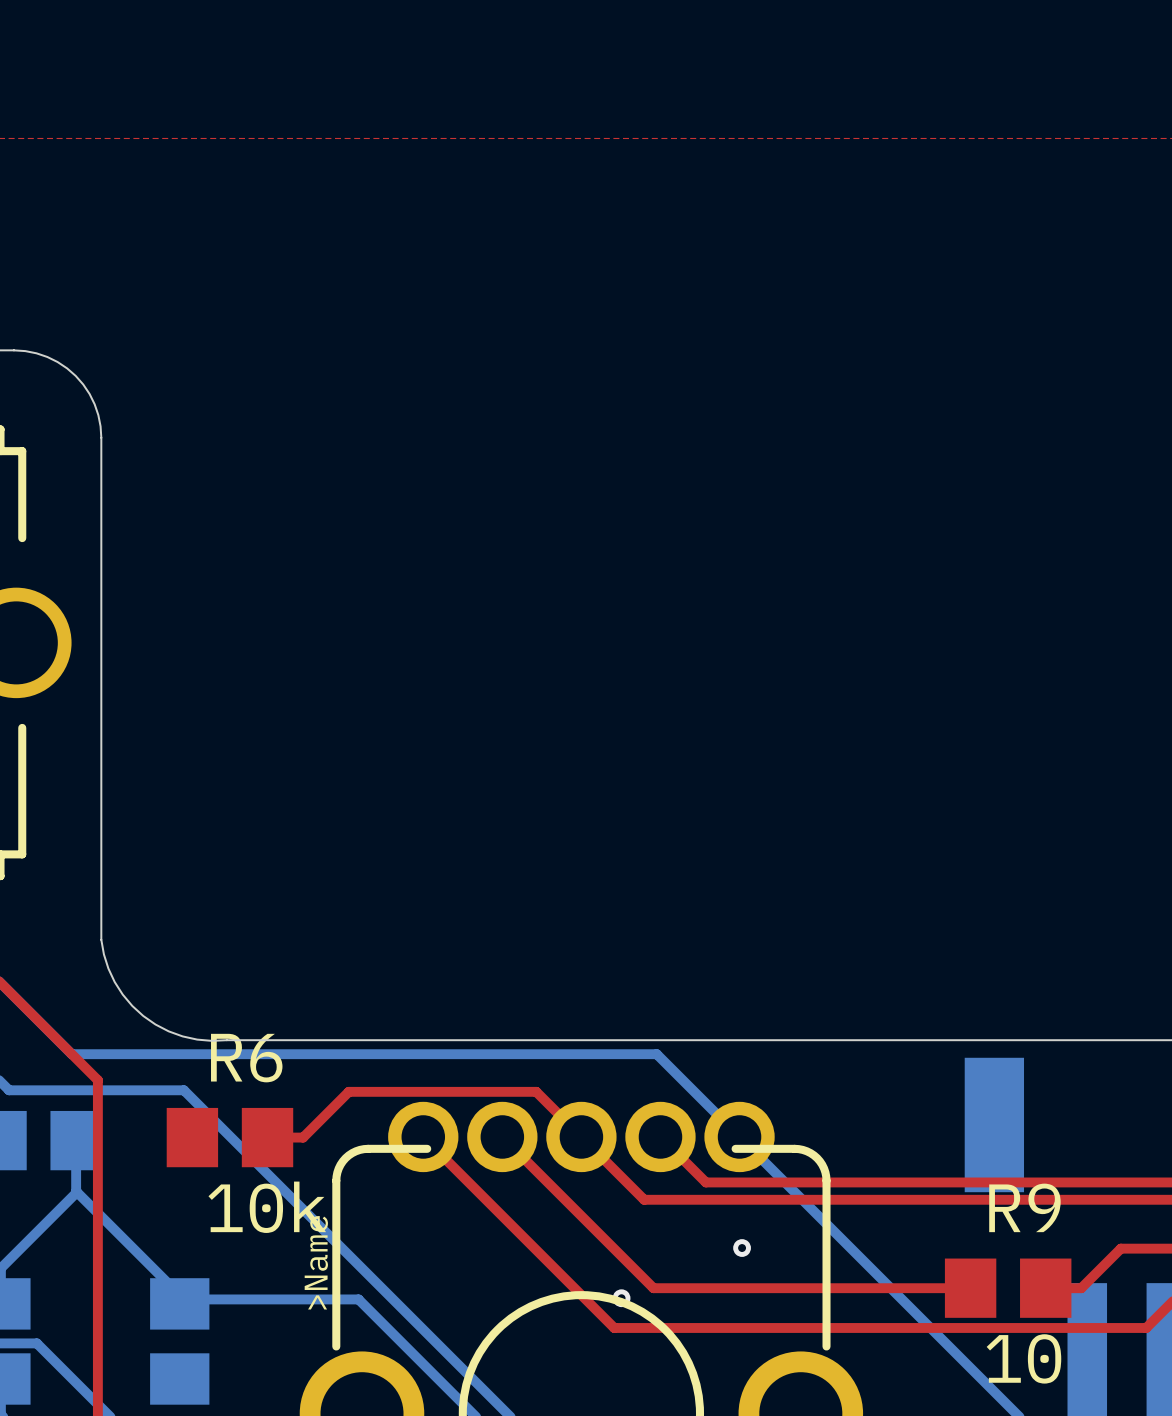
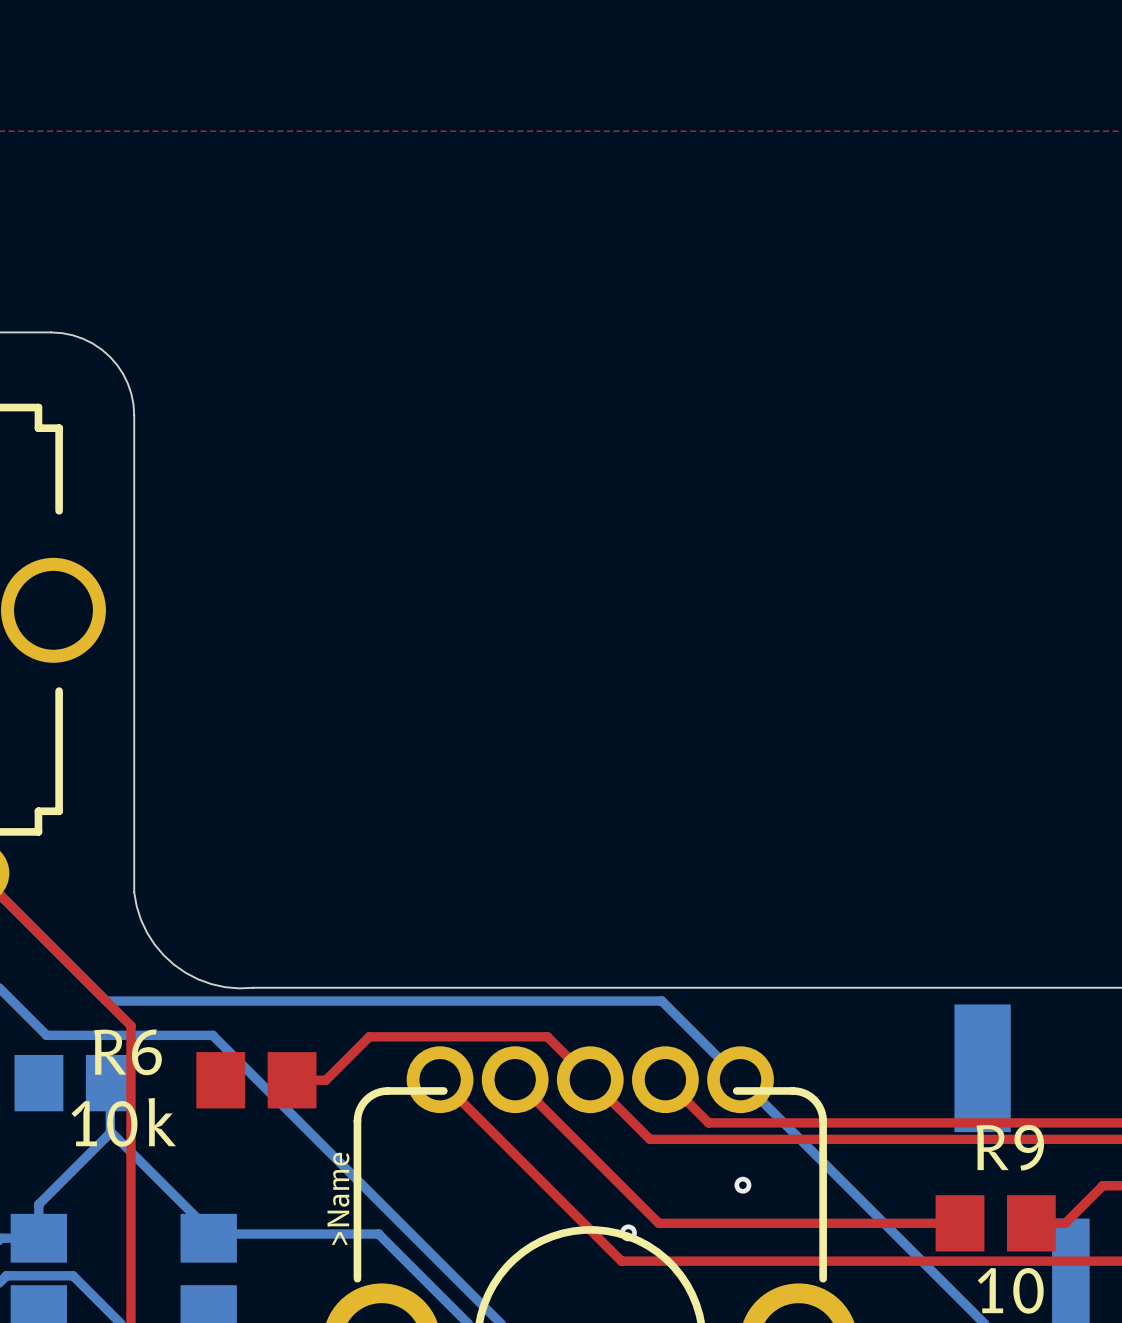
R6 name position: R6 (246, 1058) -> R6 (127, 1052)
R6 value position: 10k (267, 1207) -> 10k (123, 1122)

